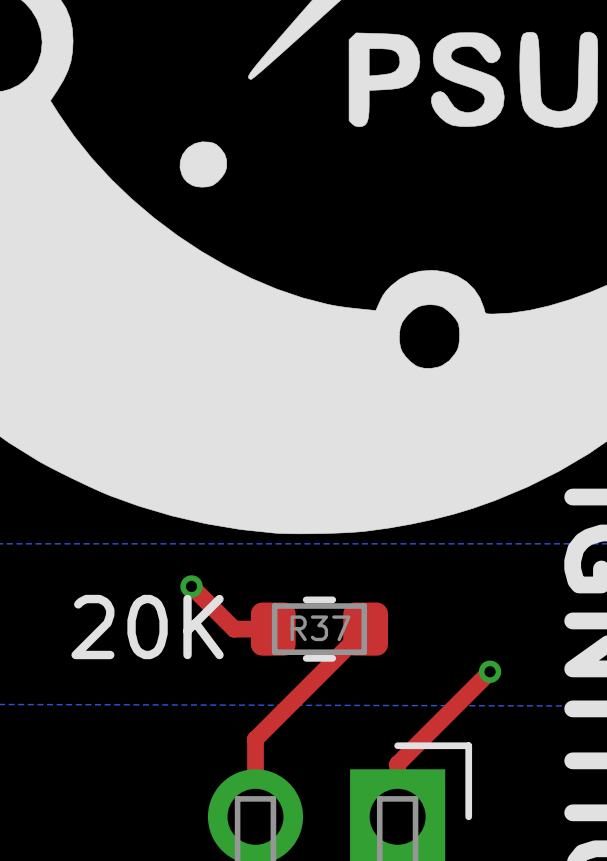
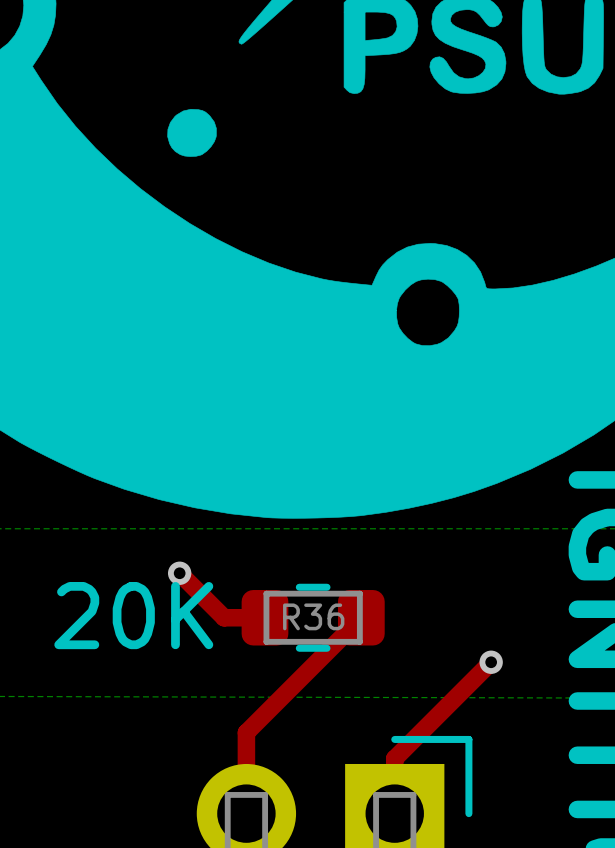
R37 name: R37 (320, 628) -> R36 (313, 616)

